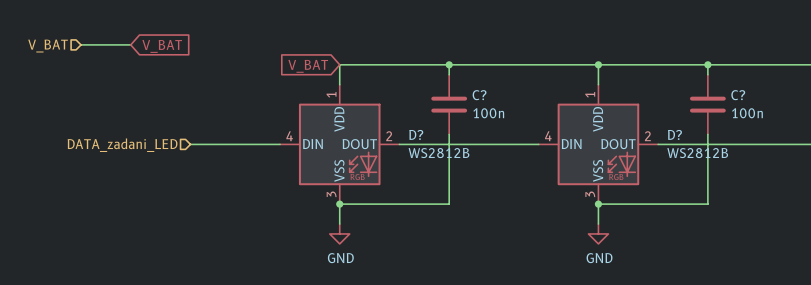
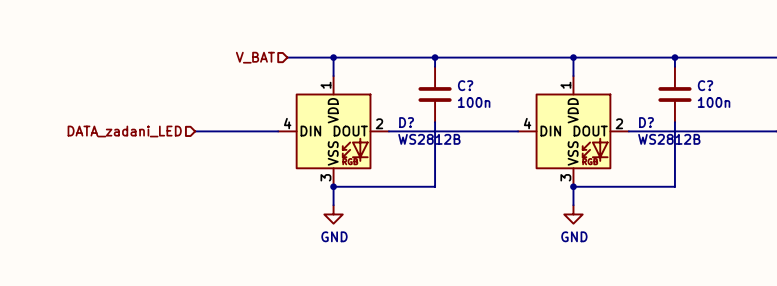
wire: (81, 44) (130, 44) -> none
hierarchical label: V_BAT (48, 46) -> none
global label: V_BAT (162, 46) -> none
wire: none -> (287, 57) (333, 57)
junction: none -> (333, 57)
hierarchical label: none -> V_BAT (255, 57)
global label: V_BAT (308, 66) -> none

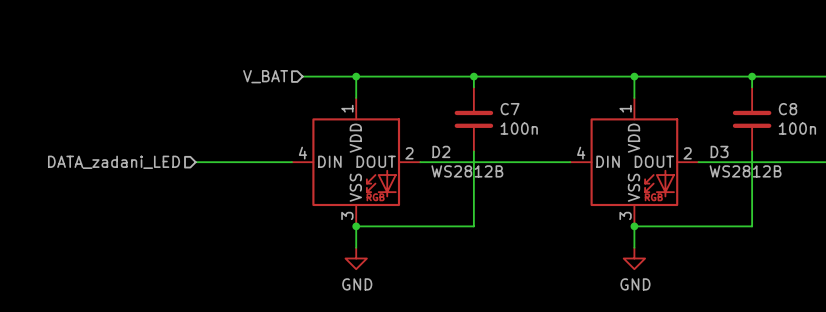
C? name: C? (465, 85) -> C7 (510, 109)
C? name: C? (705, 85) -> C8 (788, 109)
D? name: D? (406, 122) -> D2 (441, 151)
D? name: D? (646, 122) -> D3 (719, 151)

